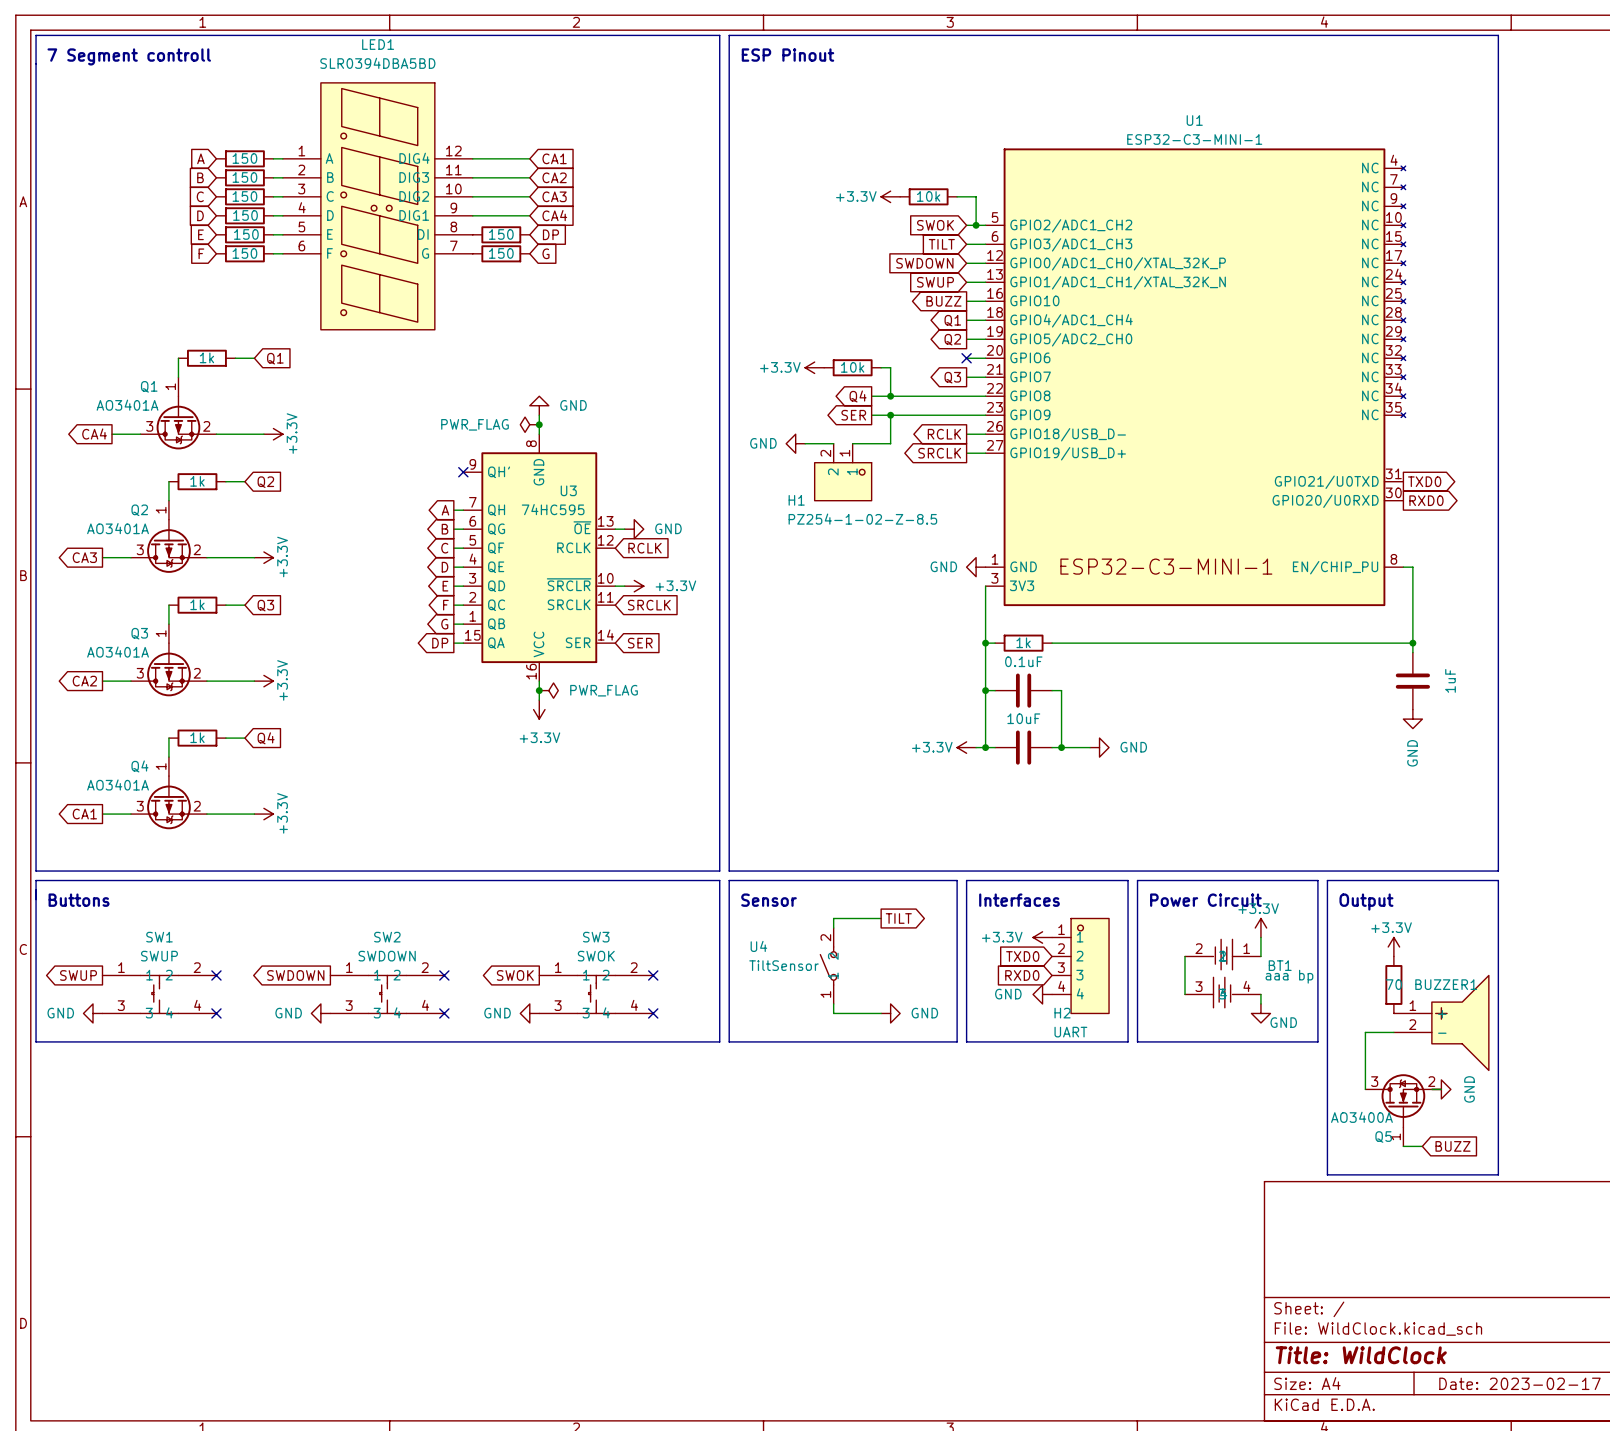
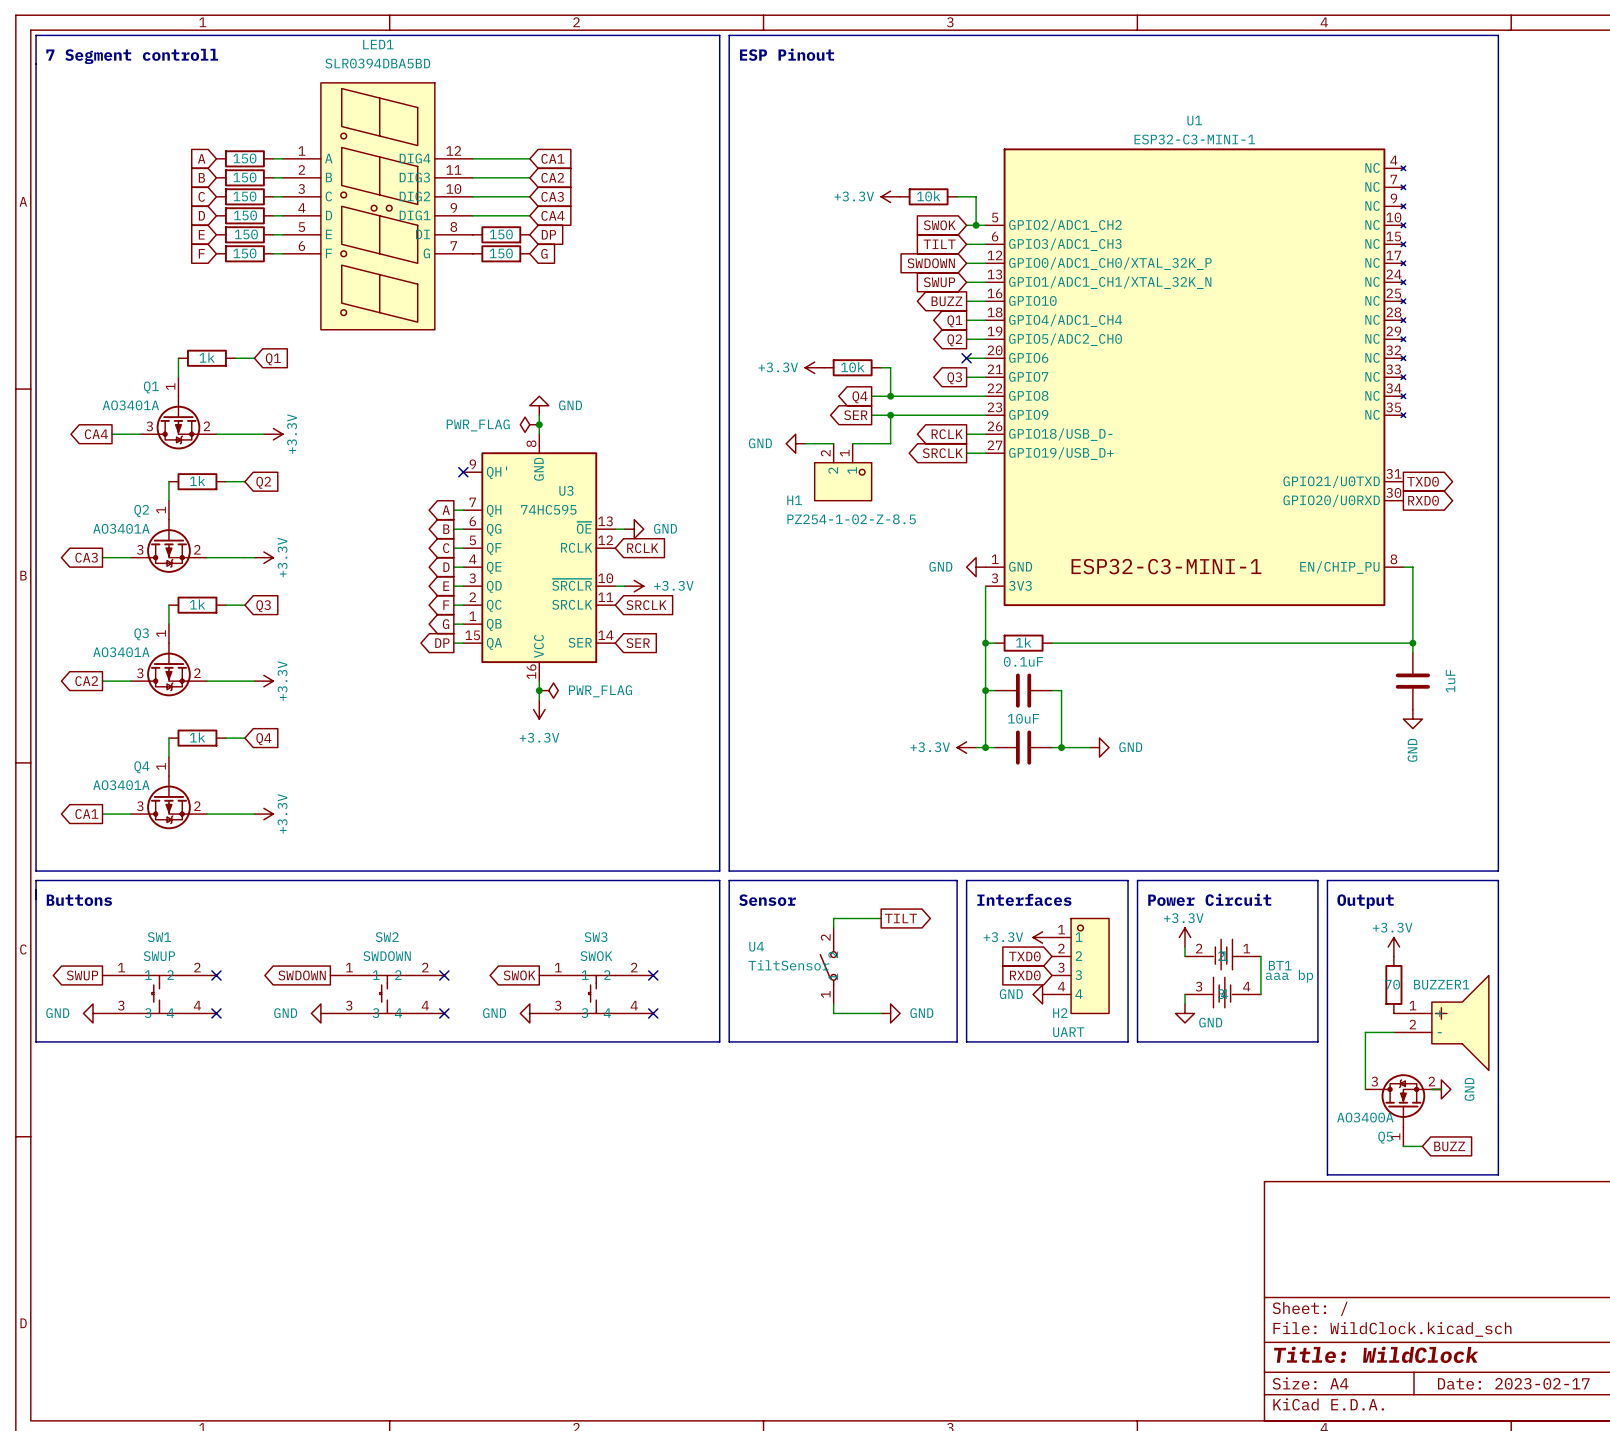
power symbol position: +3.3V (1260, 928) -> +3.3V (1185, 937)
wire: (1260, 937) (1260, 956) -> none
wire: (1185, 956) (1185, 994) -> (1185, 956) (1185, 946)
wire: none -> (1185, 994) (1185, 1003)
wire: (1260, 994) (1260, 1003) -> (1260, 994) (1260, 956)
power symbol position: GND (1260, 1013) -> GND (1185, 1013)

